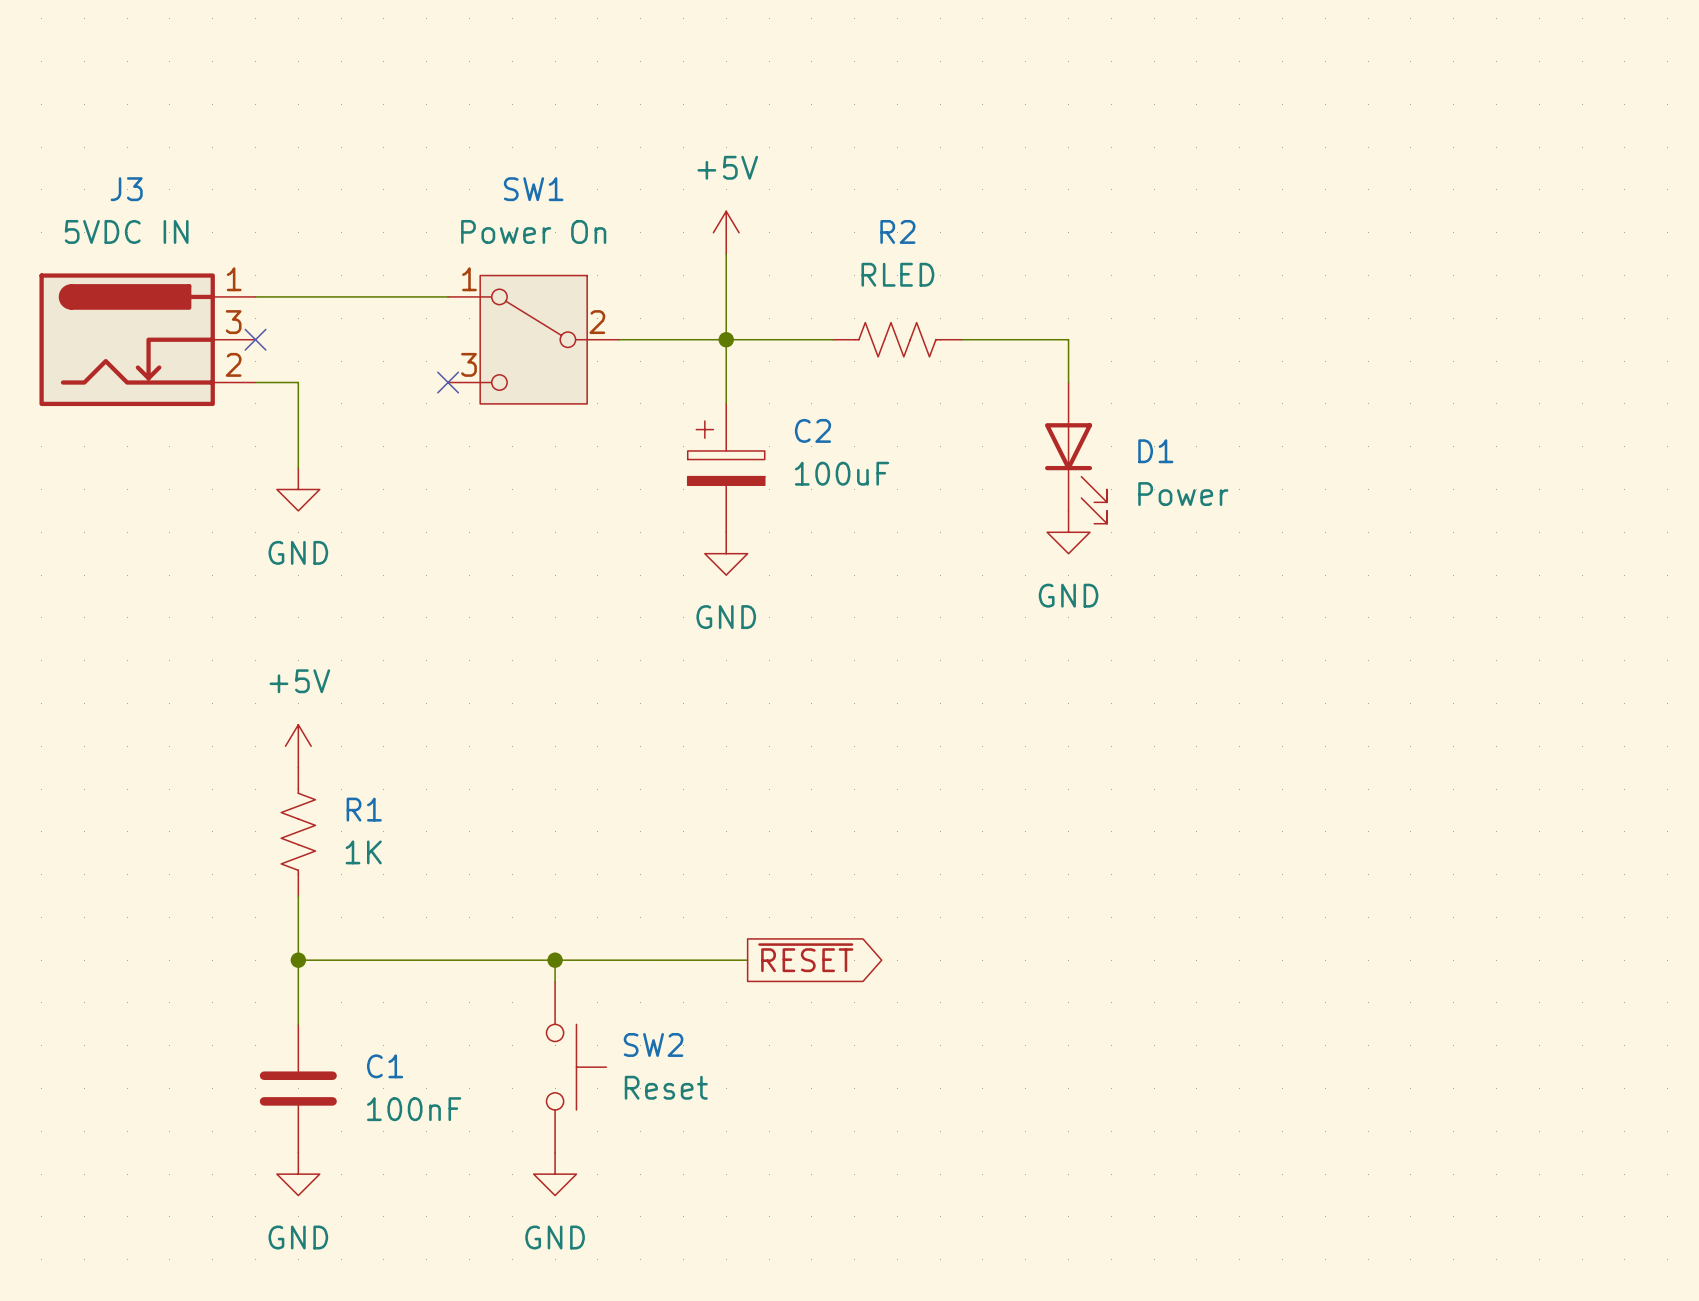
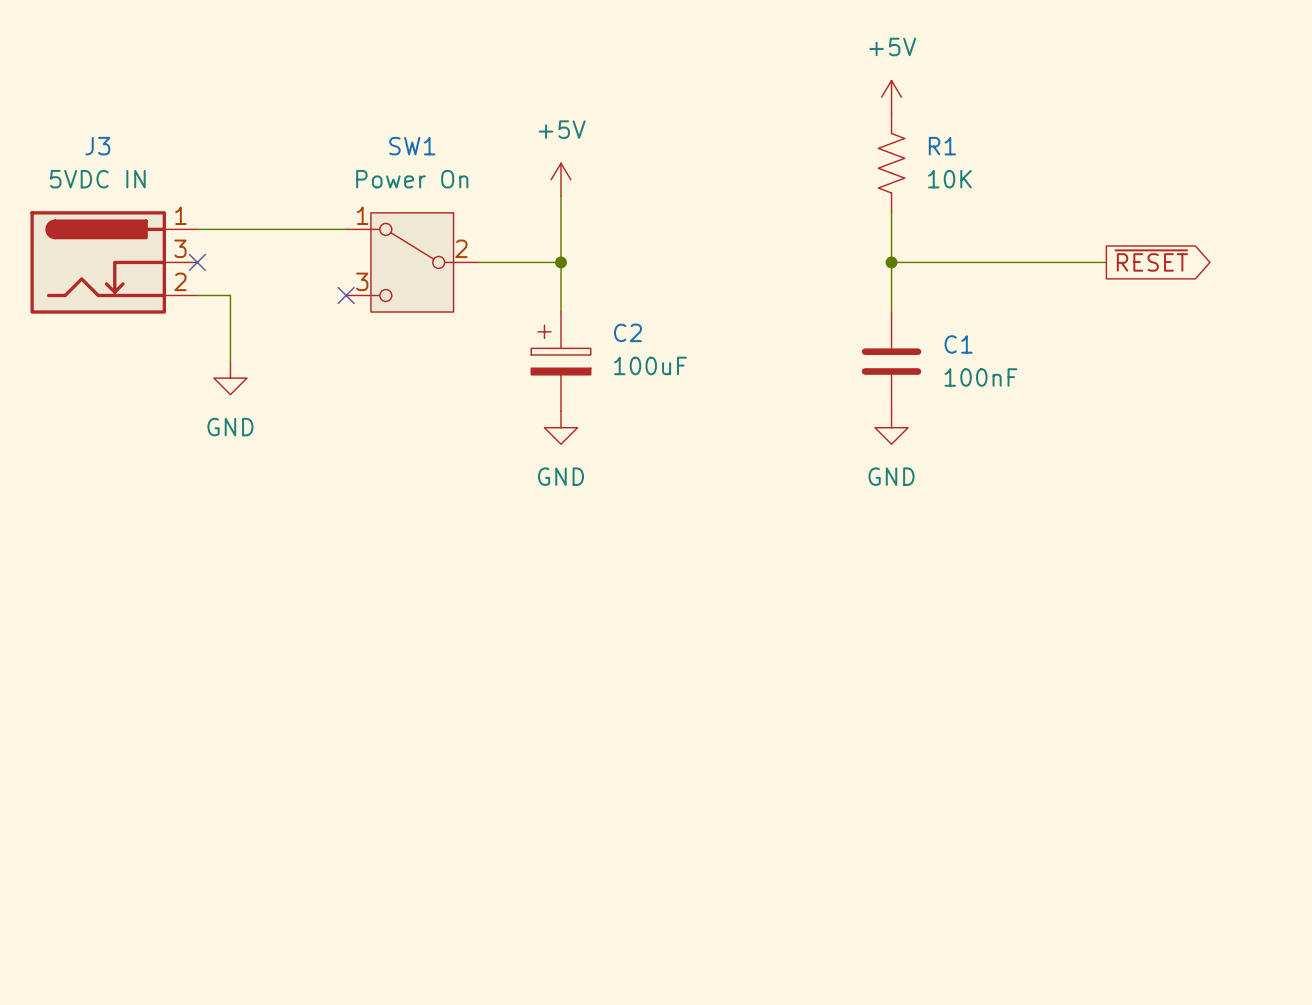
power symbol: none -> +5V (891, 97)
wire: none -> (891, 212) (891, 312)
global label: none -> ~{RESET} (1151, 260)
wire: (726, 339) (833, 339) -> none
R2: RLED (897, 339) -> none
wire: (961, 339) (1068, 339) (1068, 382) -> none
wire: none -> (891, 262) (1106, 262)
junction: none -> (891, 262)
D1: Power (1076, 453) -> none
power symbol position: GND (1068, 532) -> GND (891, 427)
power symbol: +5V (298, 746) -> none
R1 position: (298, 831) -> (891, 163)
R1 value: 1K (363, 852) -> 10K (949, 179)
wire: (298, 896) (298, 1024) -> none
global label: ~{RESET} (805, 957) -> none
wire: (298, 960) (747, 960) -> none
junction: (298, 960) -> none
wire: (555, 960) (555, 981) -> none
junction: (555, 960) -> none
SW2: Reset (576, 1067) -> none
C1 position: (298, 1088) -> (891, 361)
power symbol: GND (298, 1174) -> none
power symbol: GND (555, 1174) -> none

